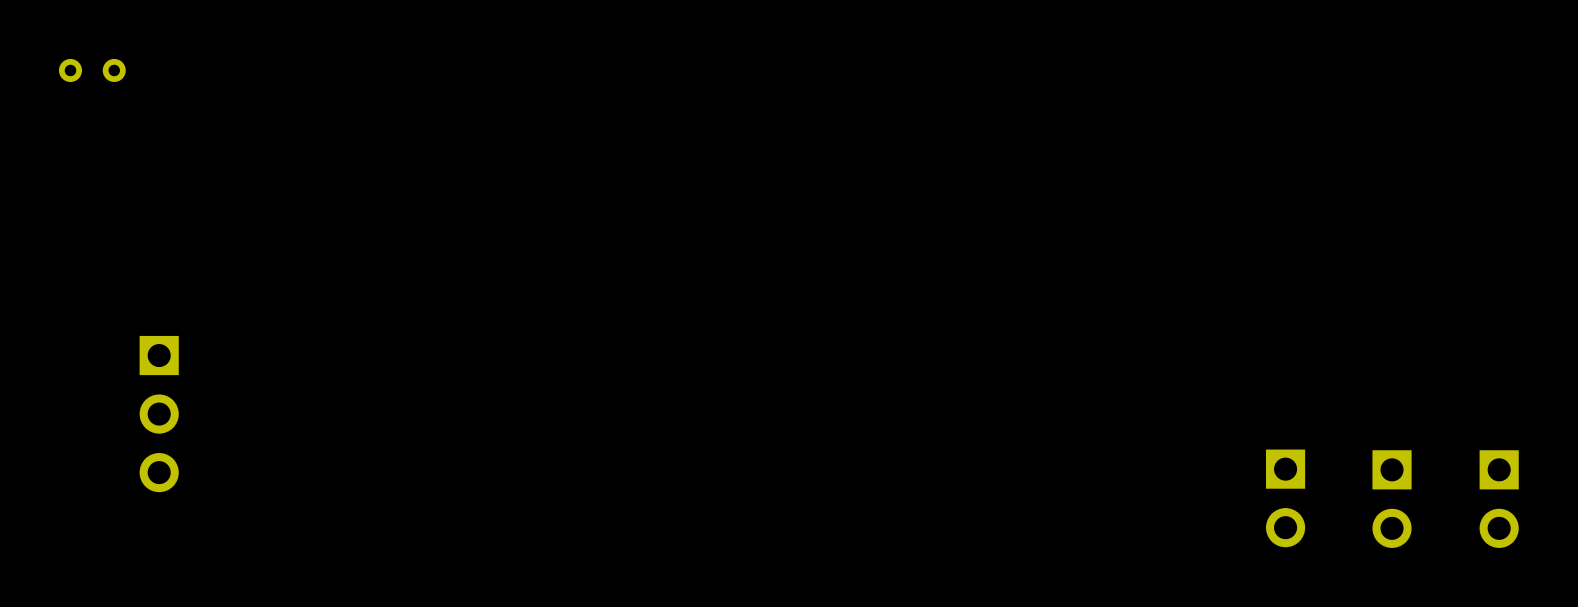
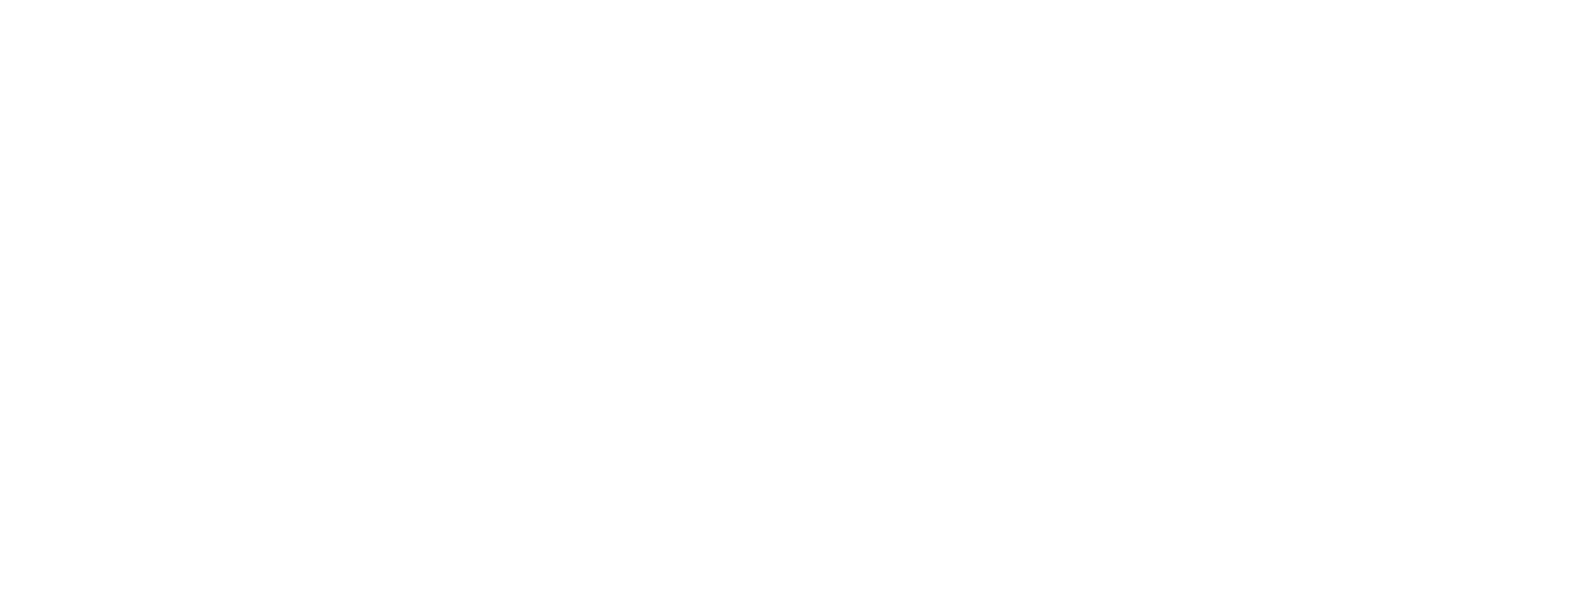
part: (92, 70) -> none
part: (159, 414) -> none
part: (1285, 498) -> none
part: (1392, 499) -> none
part: (1499, 499) -> none

